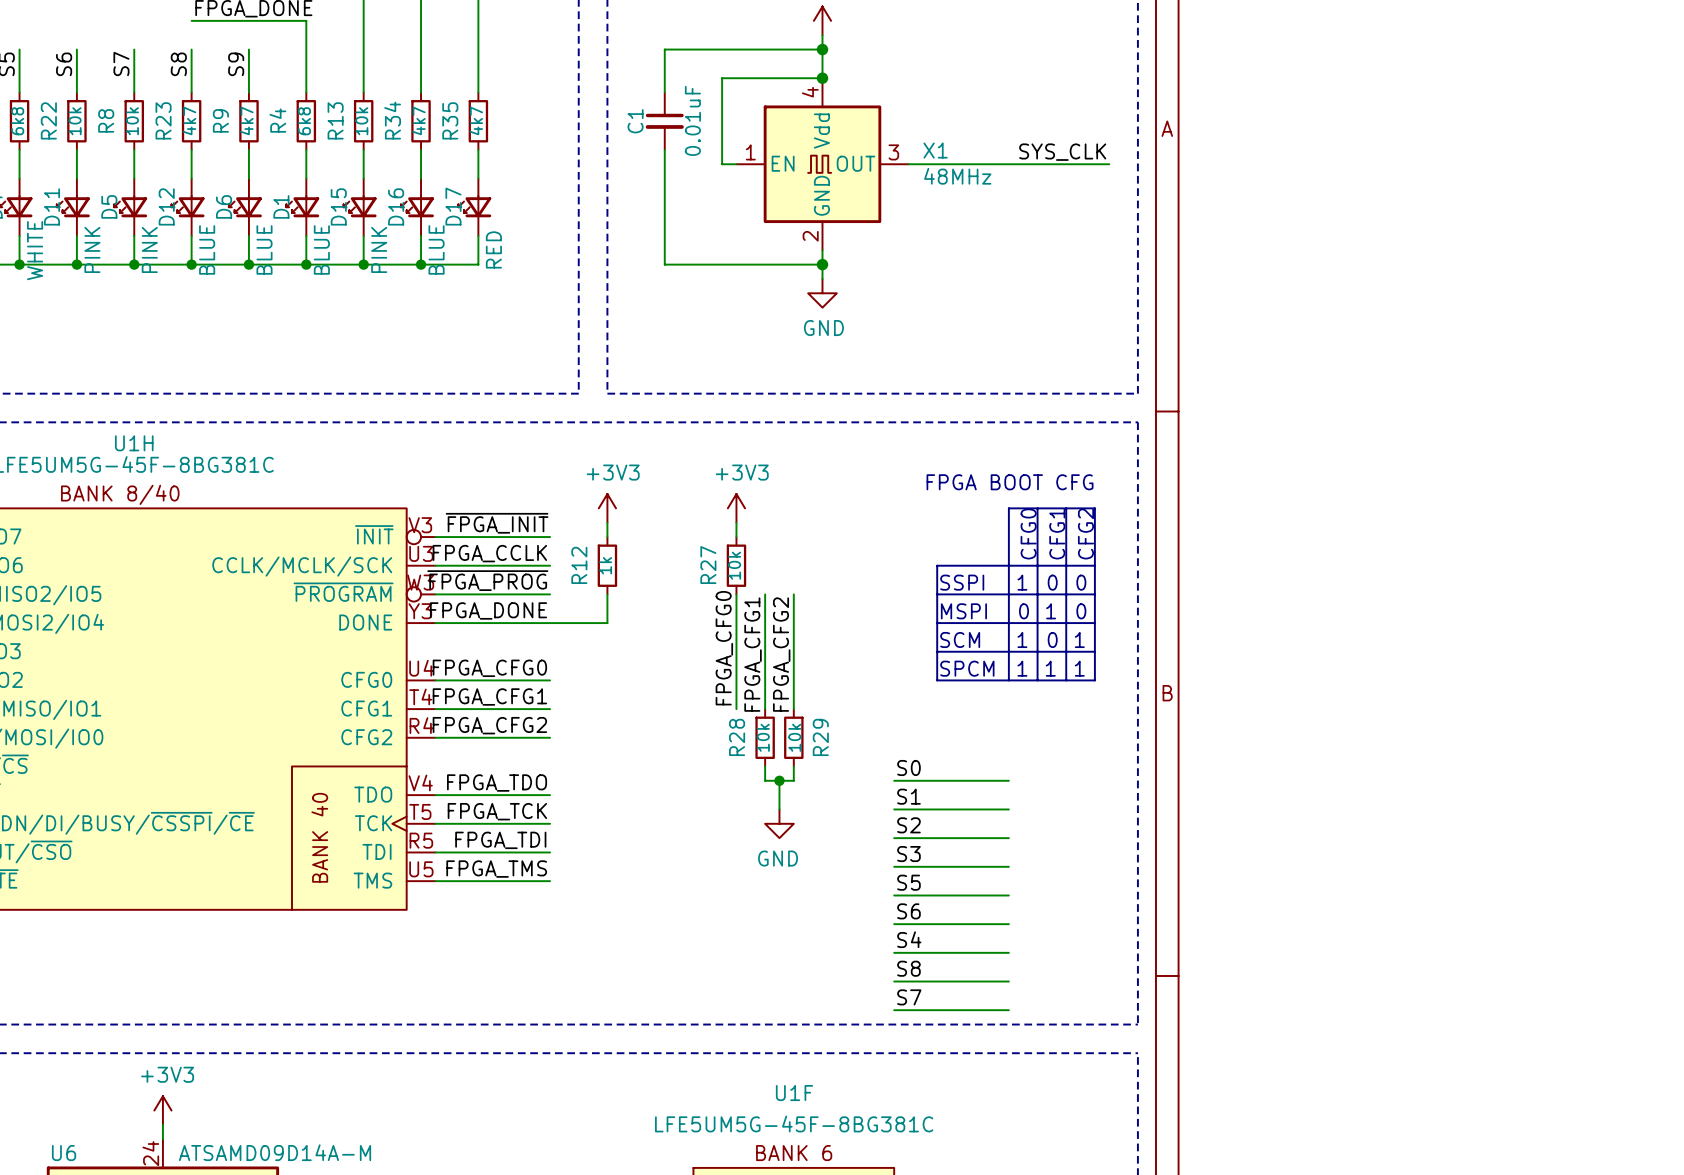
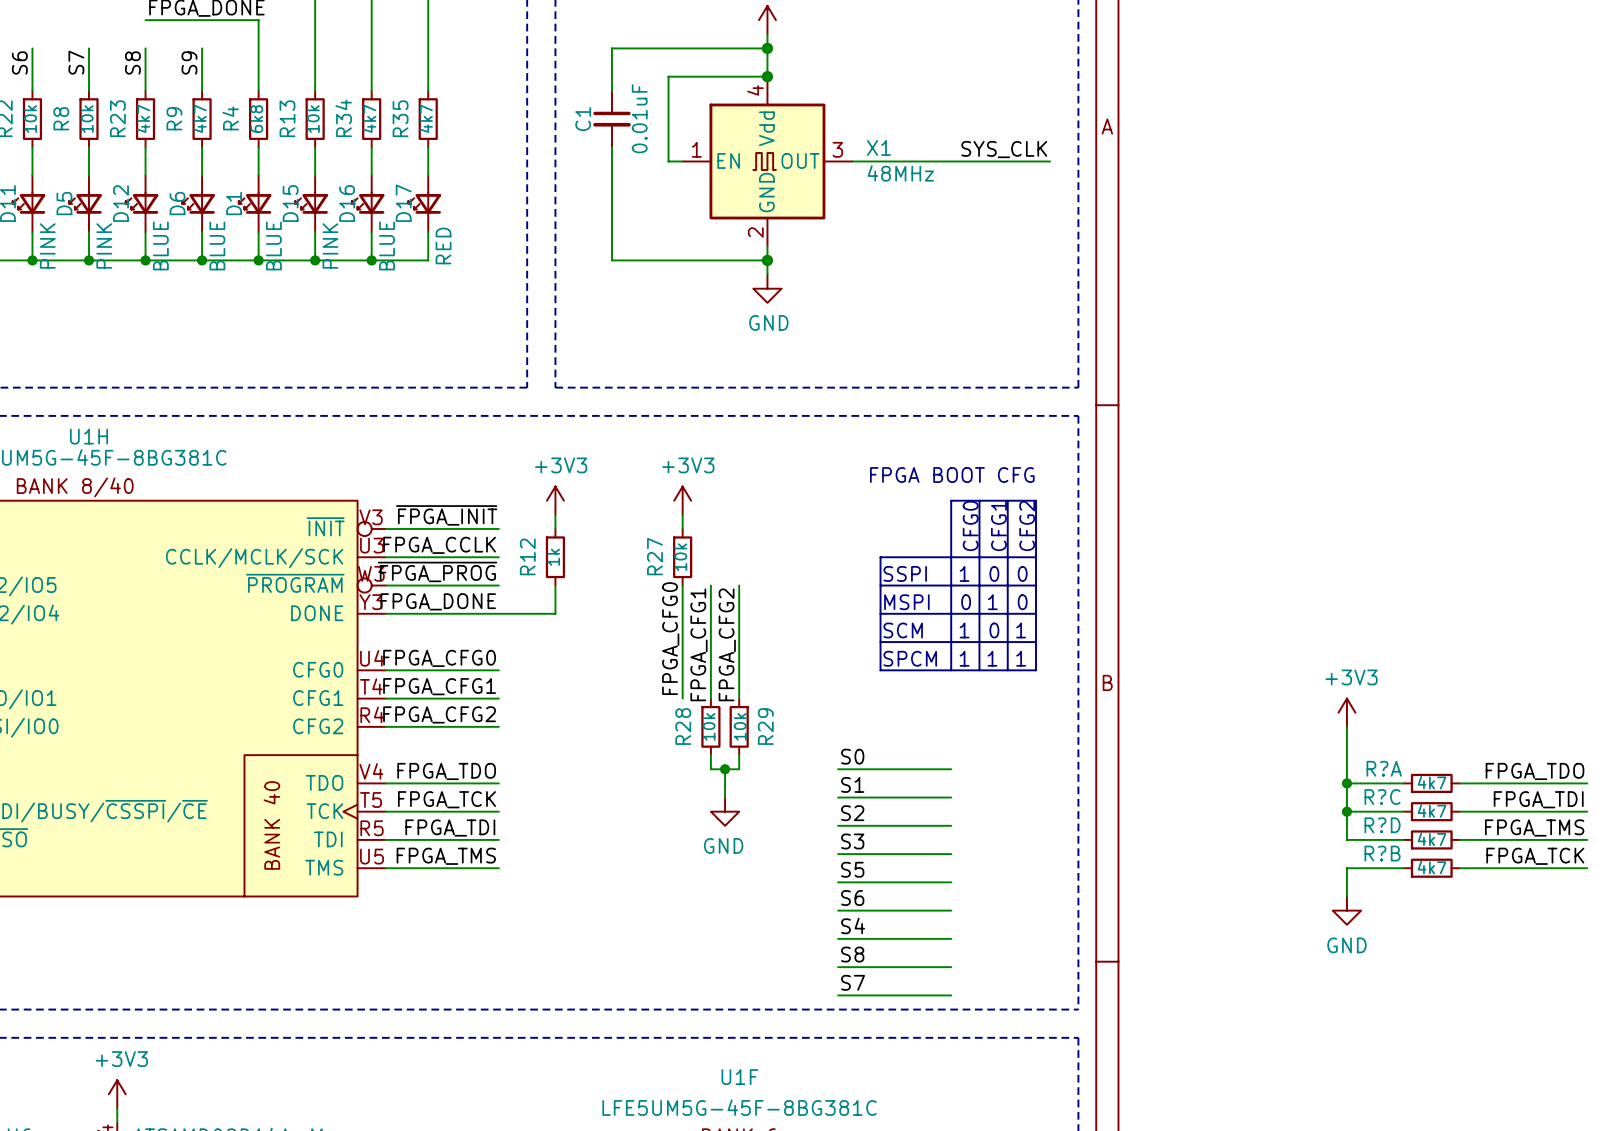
power symbol: none -> +3V3 (1346, 712)
wire: none -> (1346, 726) (1346, 839) (1403, 839)
label: none -> FPGA_TDO (1534, 771)
wire: none -> (1346, 783) (1403, 783)
junction: none -> (1346, 783)
R?A: none -> 4k7 (1431, 783)
wire: none -> (1460, 783) (1587, 783)
label: none -> FPGA_TDI (1538, 799)
wire: none -> (1346, 811) (1403, 811)
junction: none -> (1346, 811)
R?C: none -> 4k7 (1431, 811)
wire: none -> (1460, 811) (1587, 811)
label: none -> FPGA_TMS (1534, 828)
R?D: none -> 4k7 (1431, 839)
wire: none -> (1460, 839) (1587, 839)
label: none -> FPGA_TCK (1535, 856)
wire: none -> (1403, 868) (1346, 868) (1346, 896)
R?B: none -> 4k7 (1431, 868)
wire: none -> (1460, 868) (1587, 868)
power symbol: none -> GND (1346, 910)

